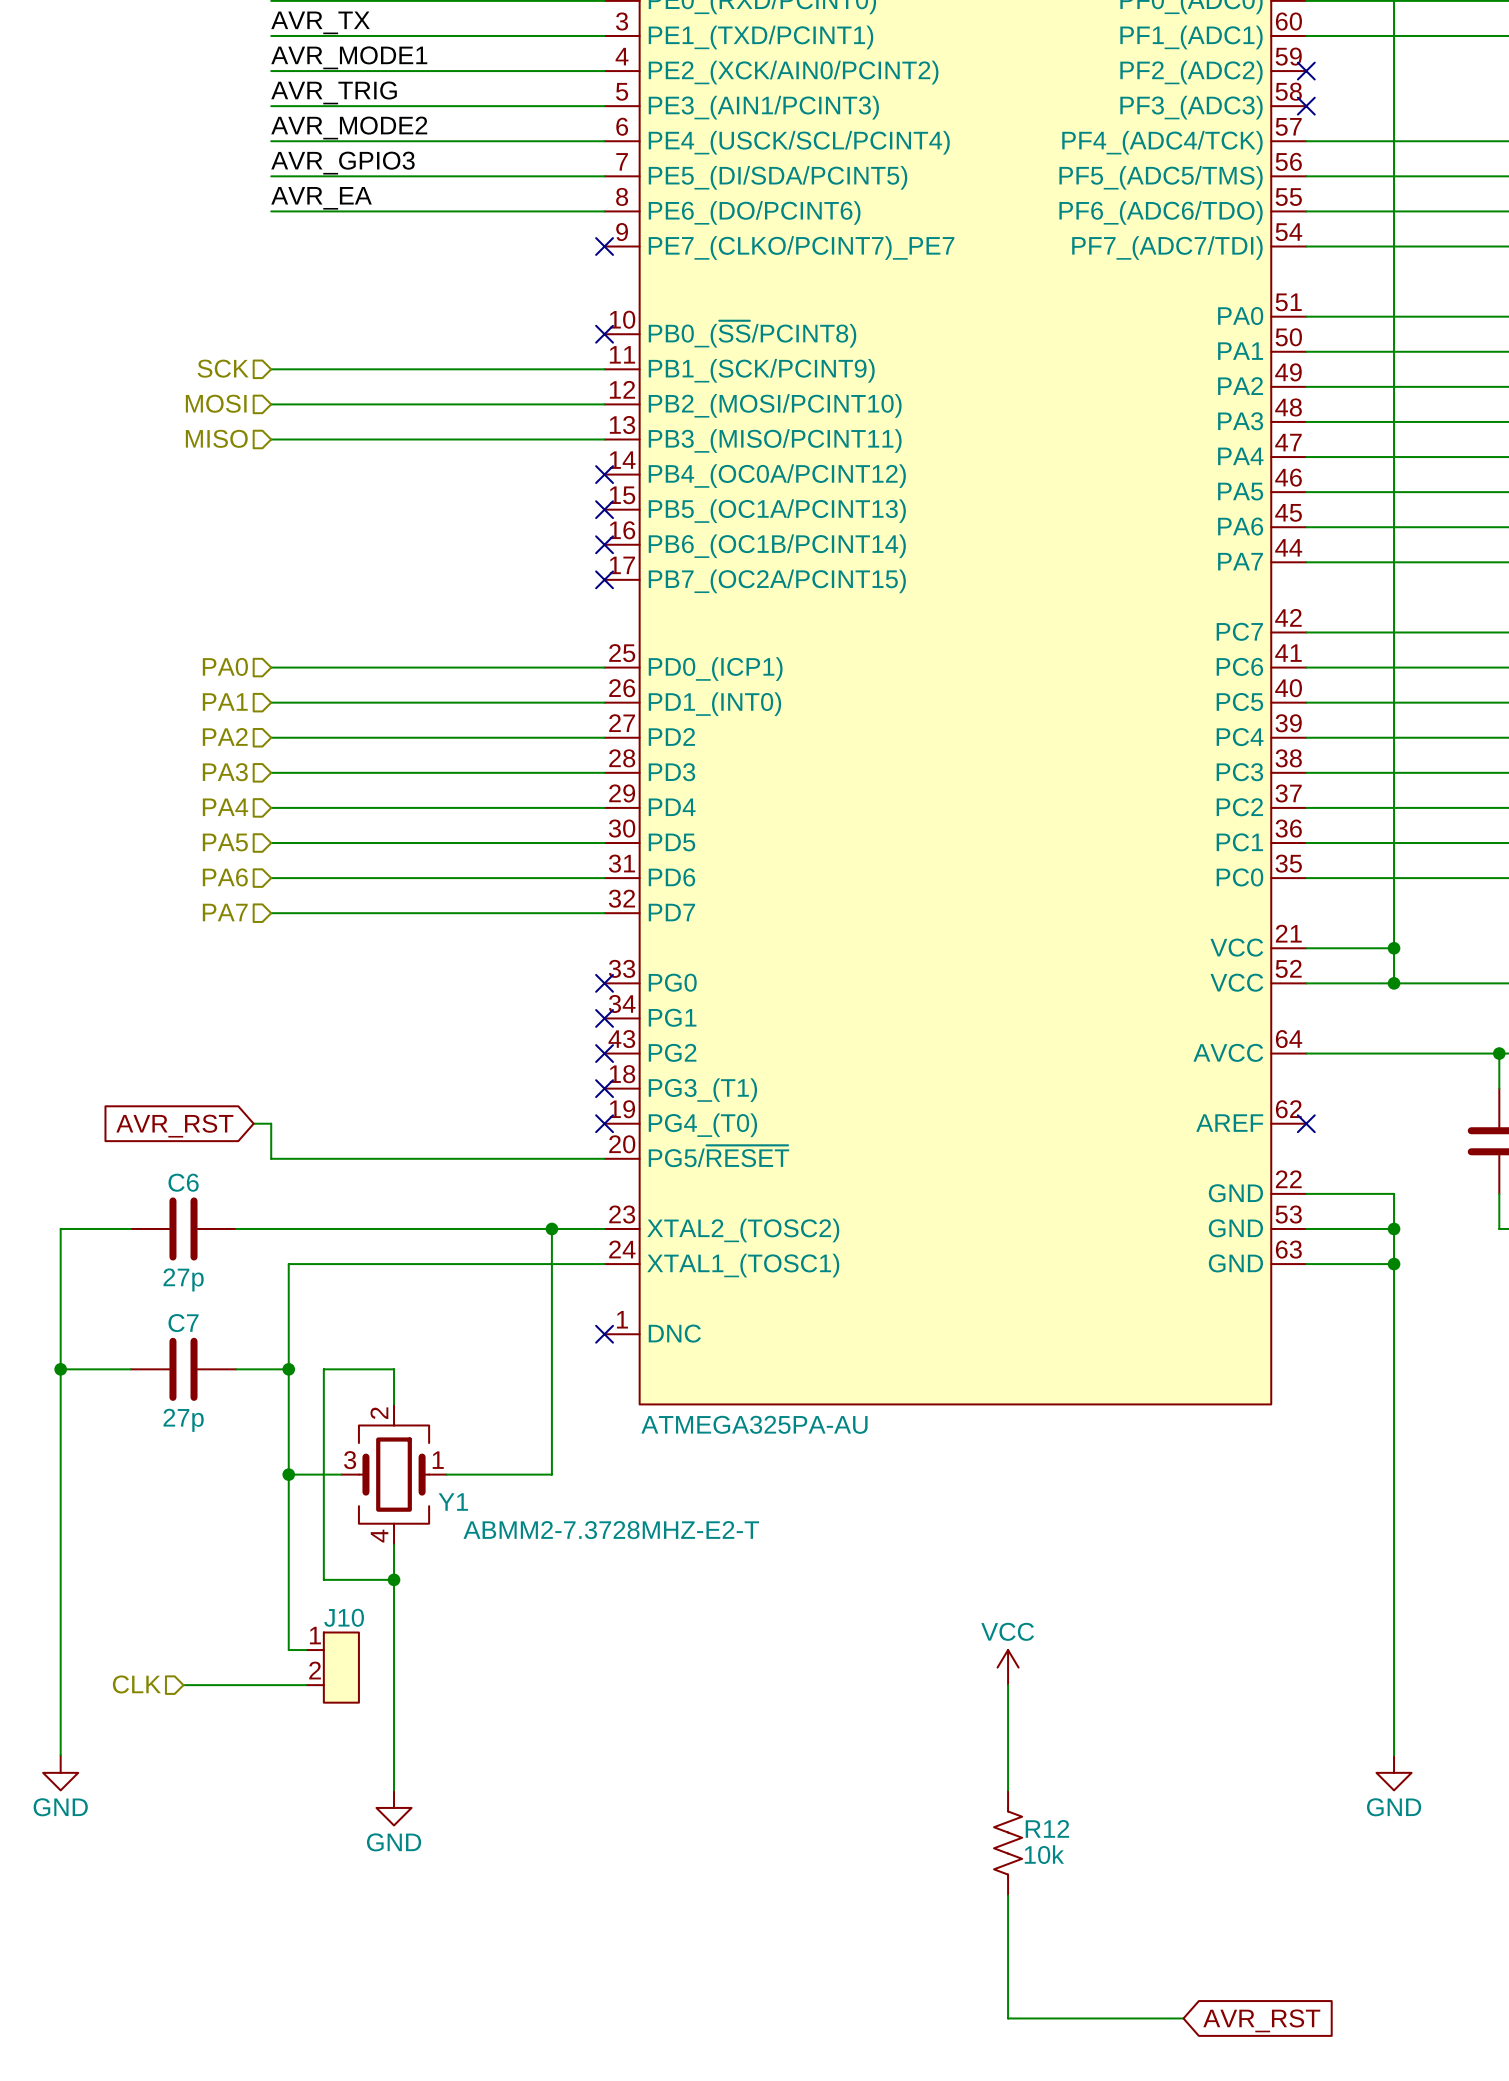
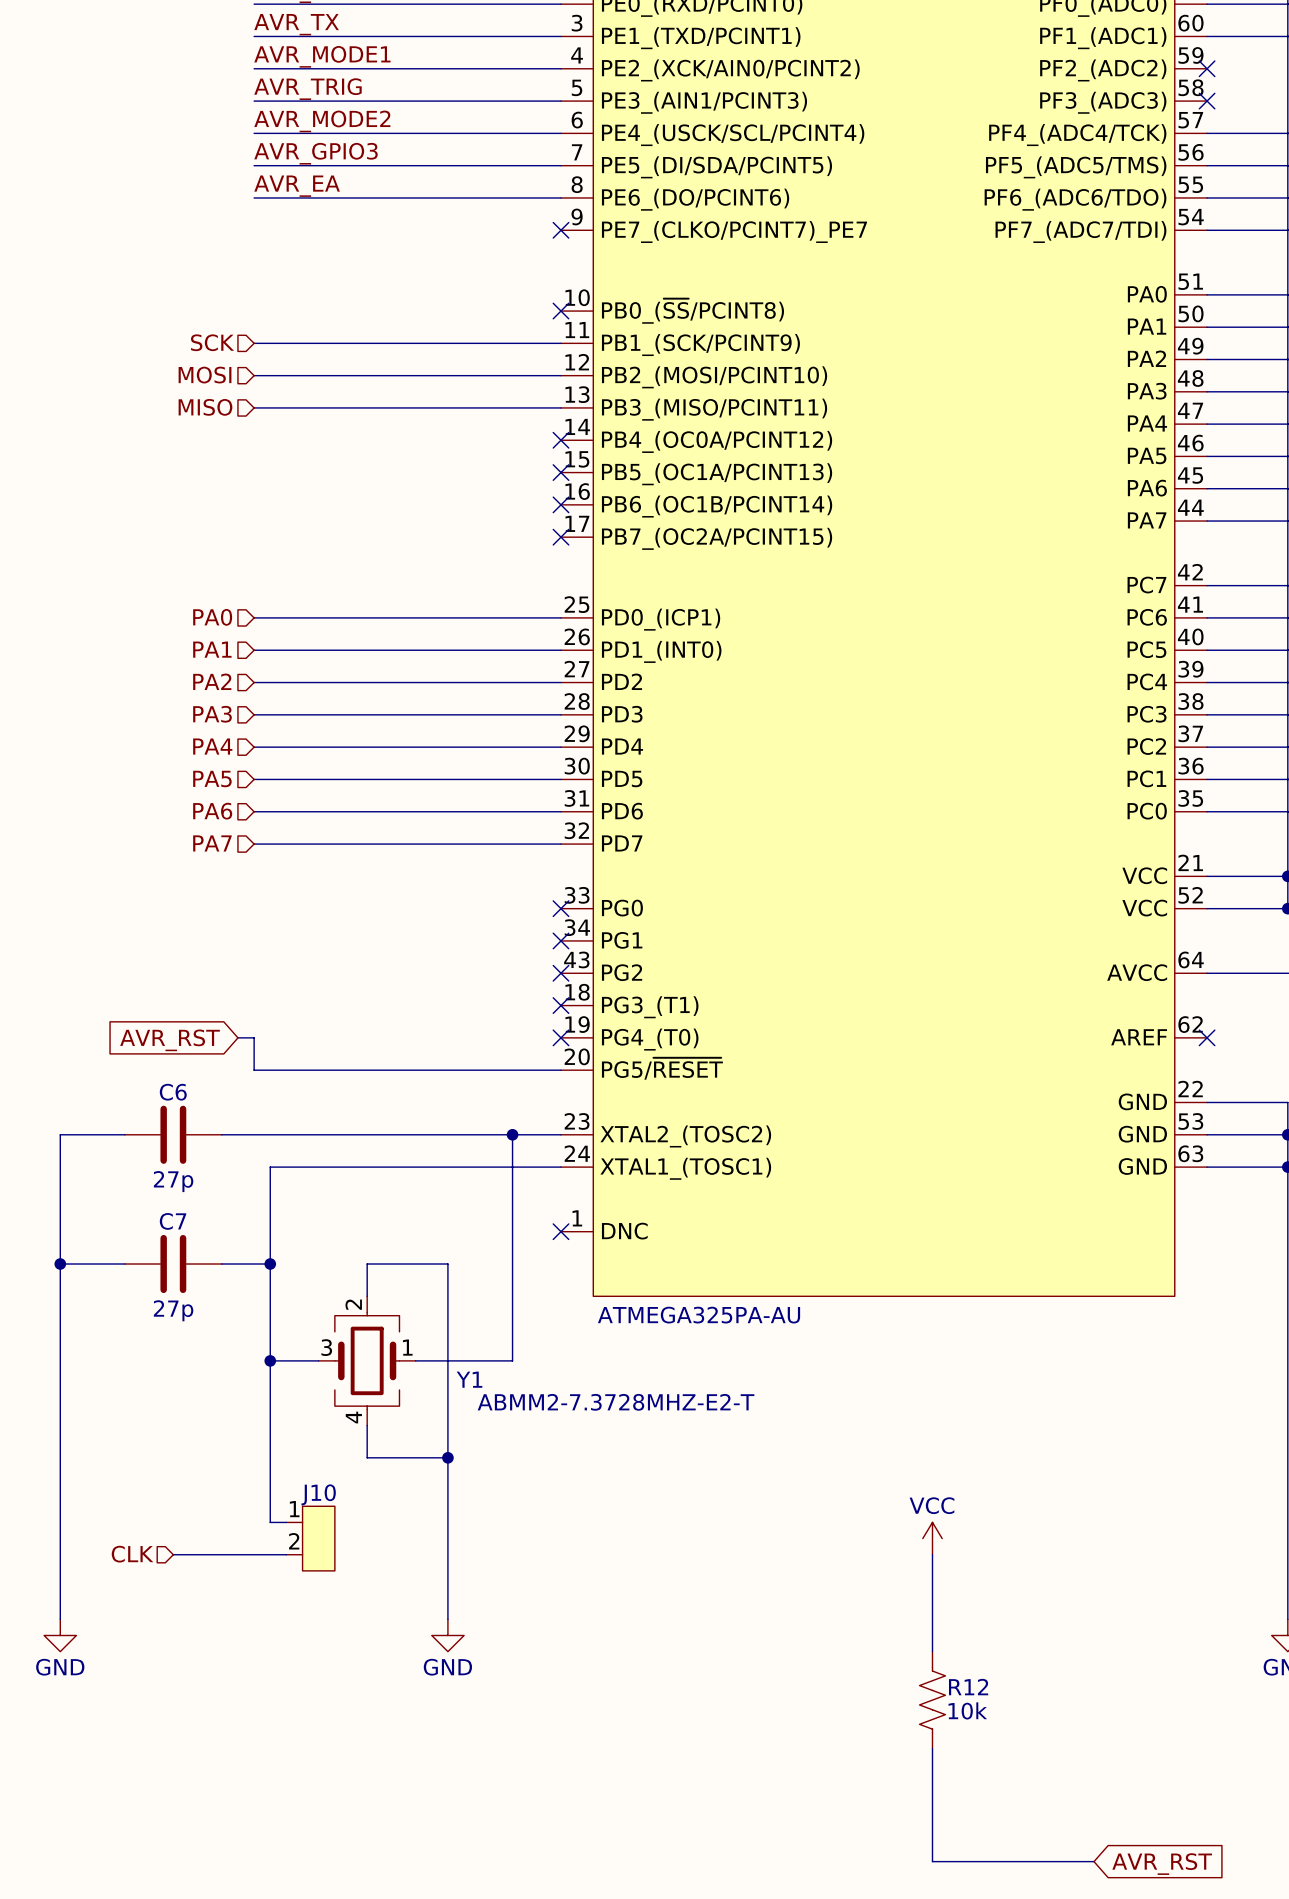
wire: (394, 1369) (323, 1369) (323, 1579) (394, 1579) (394, 1790) -> (367, 1264) (447, 1264) (447, 1619)
Y1 name position: Y1 (453, 1502) -> Y1 (469, 1379)
Y1 text position: ABMM2-7.3728MHZ-E2-T (611, 1530) -> ABMM2-7.3728MHZ-E2-T (616, 1402)
wire: none -> (367, 1457) (447, 1457)
junction: (394, 1579) -> none
junction: none -> (447, 1457)
power symbol position: GND (394, 1807) -> GND (447, 1635)

